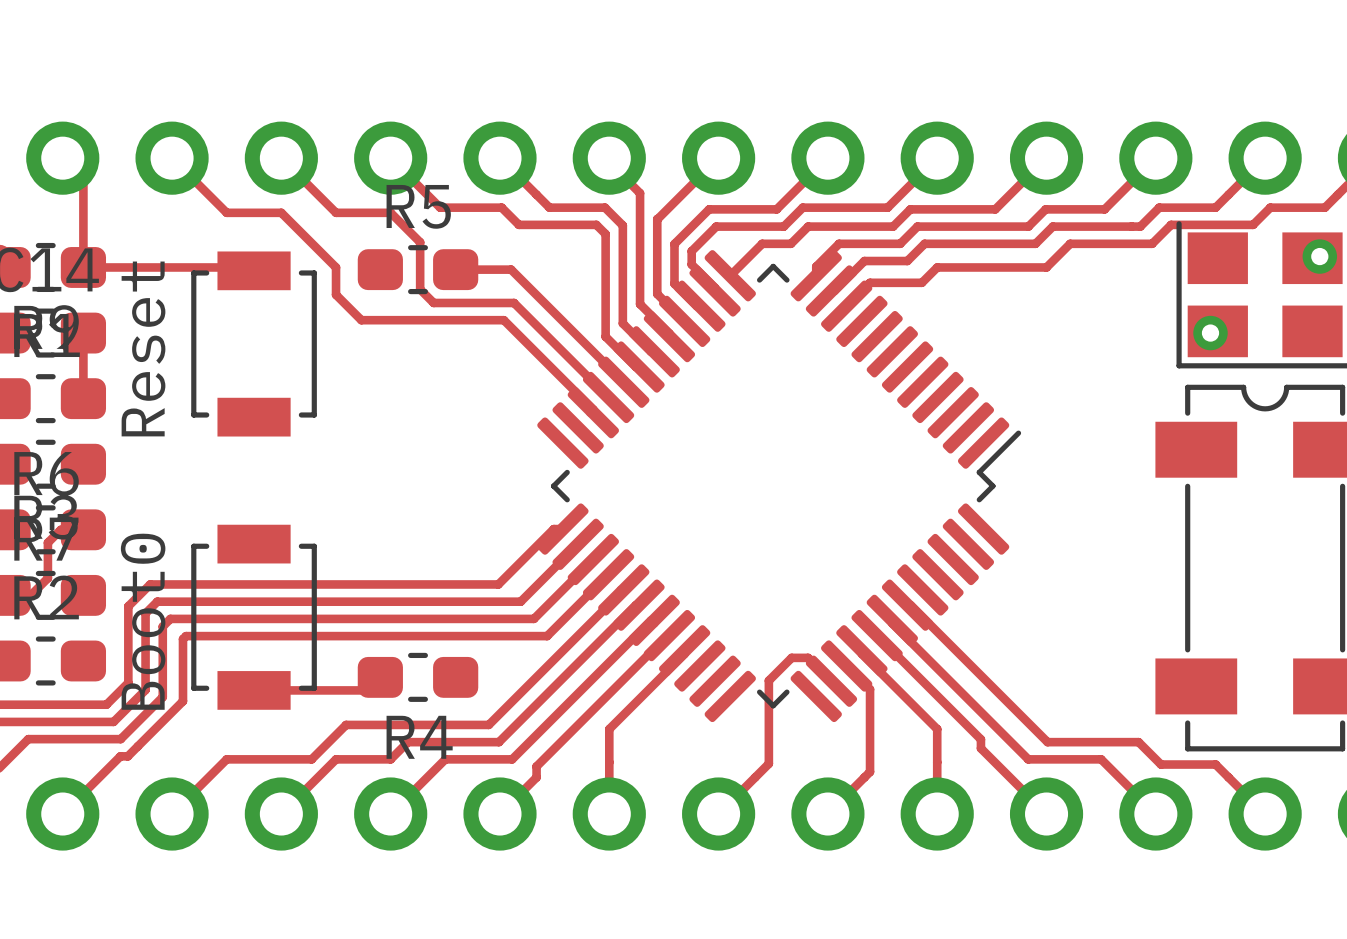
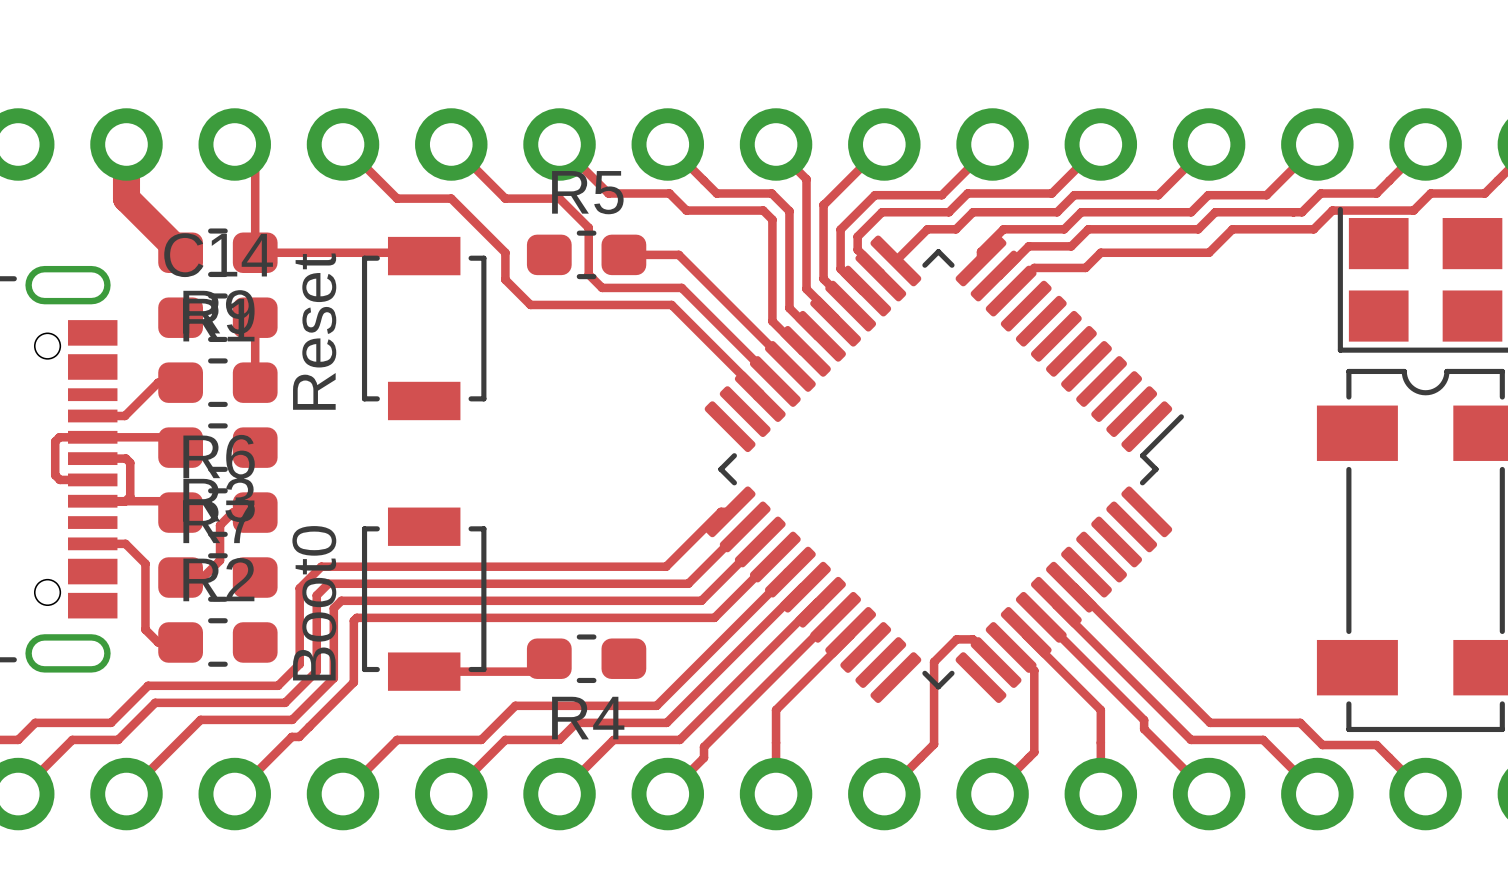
via: (1319, 256) -> none
via: (1210, 333) -> none

